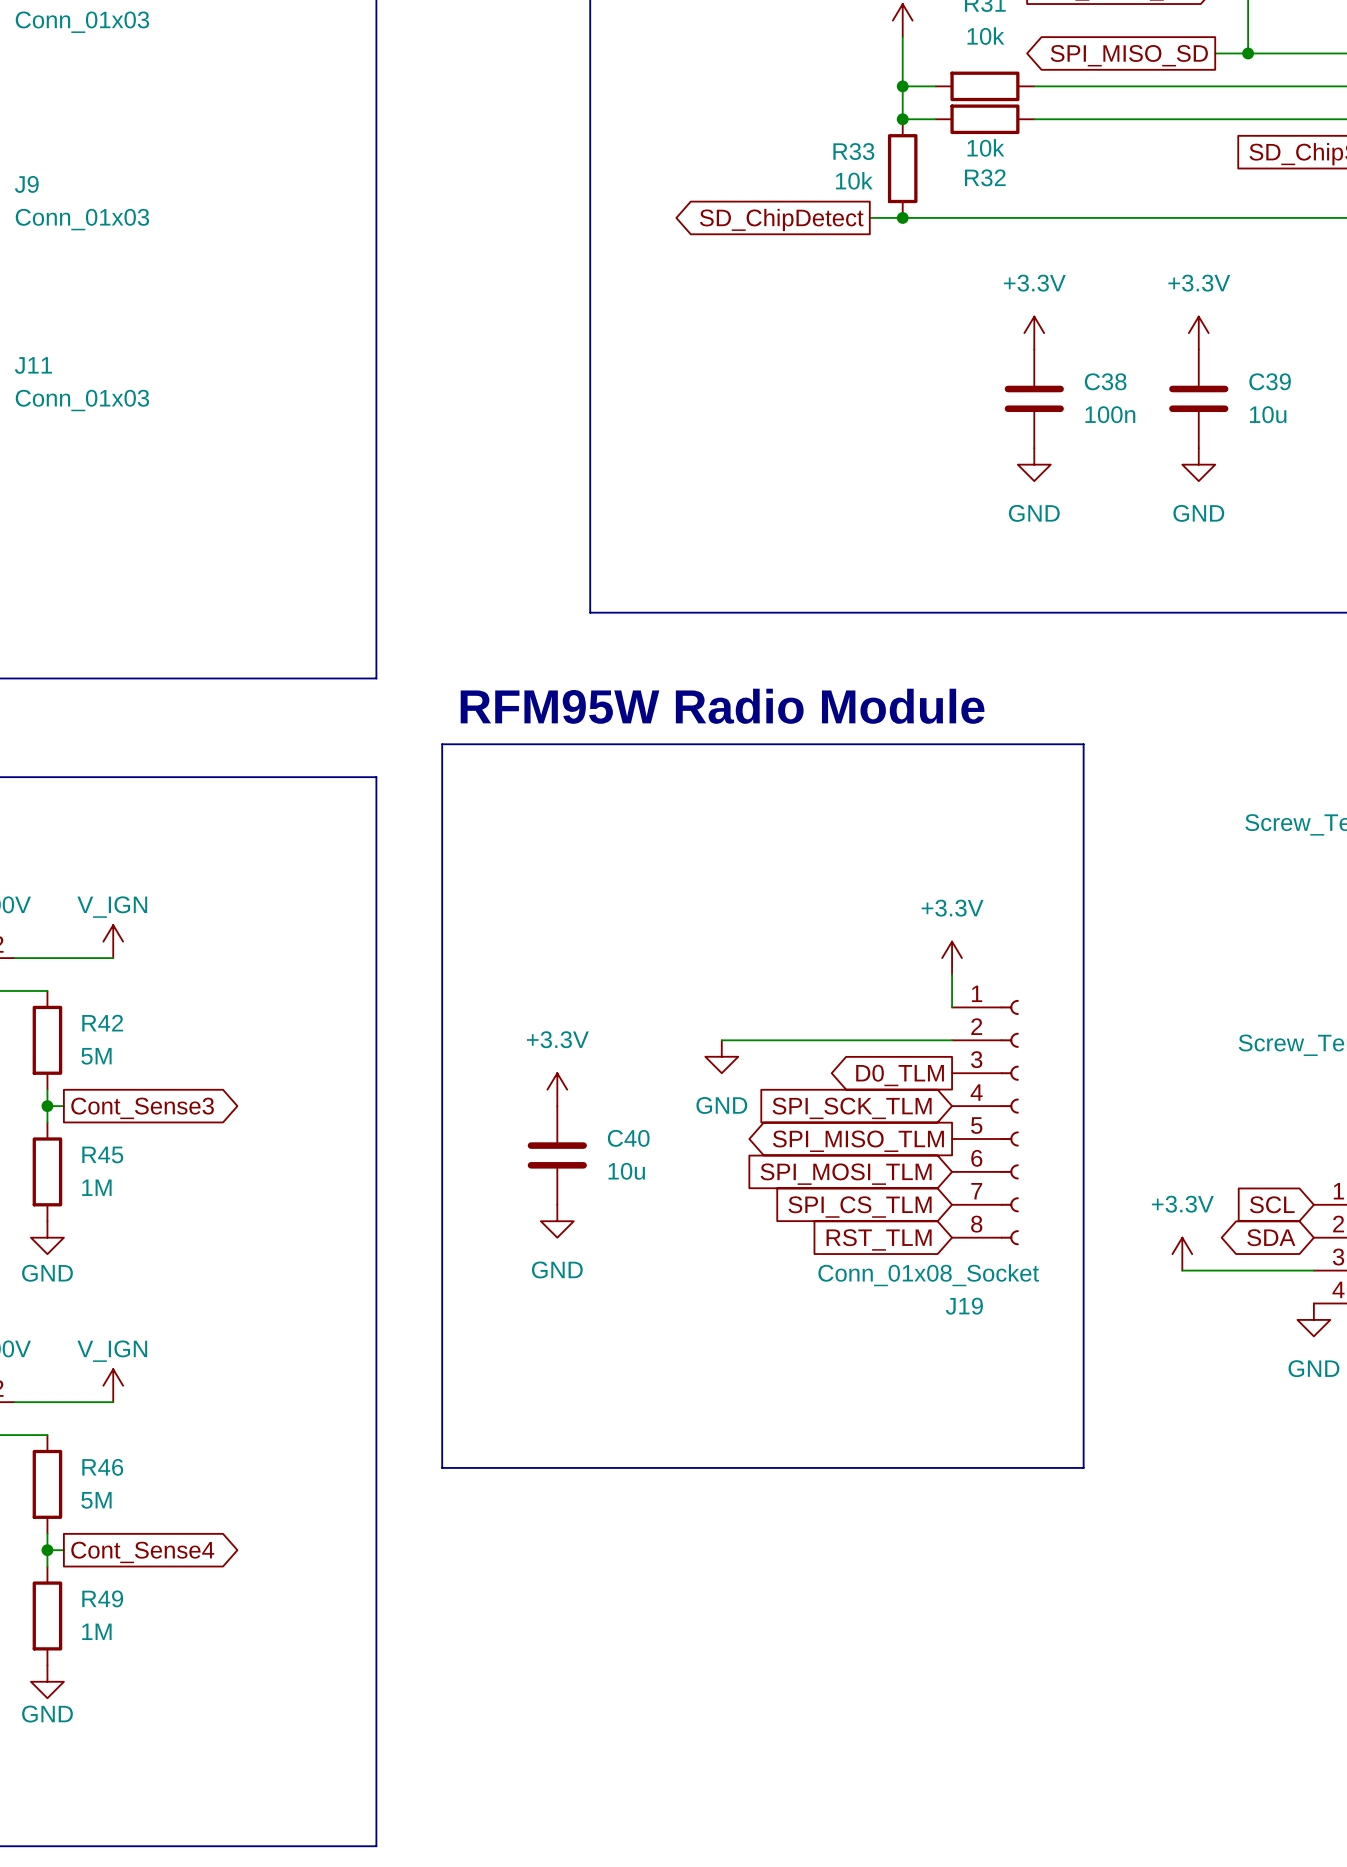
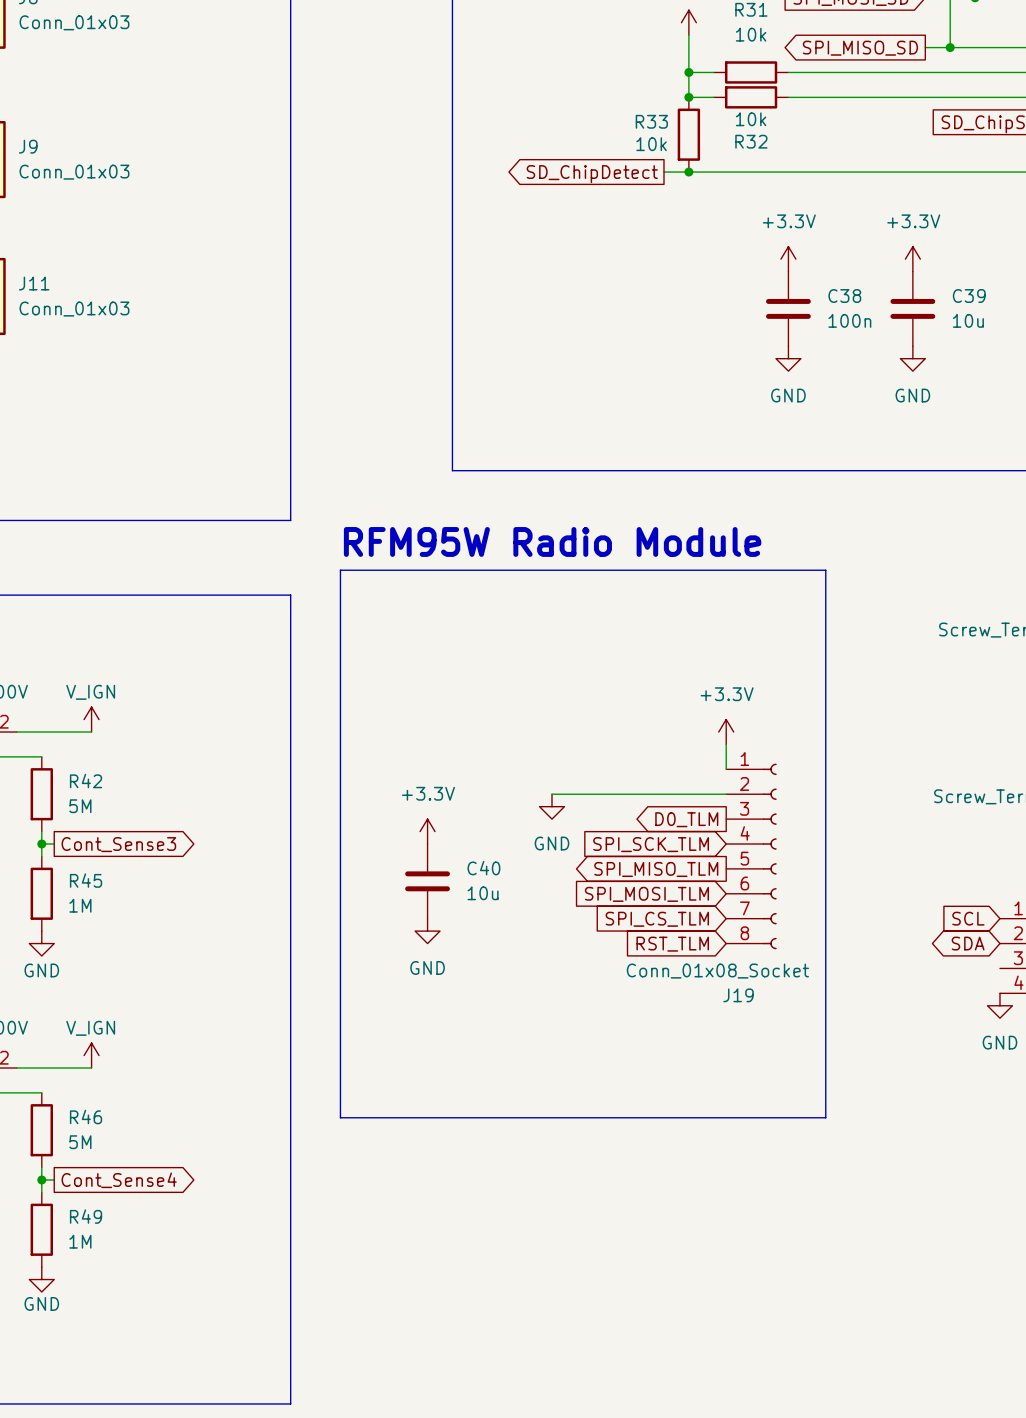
power symbol: +3.3V (1182, 1254) -> none
wire: (1182, 1270) (1313, 1270) -> none

